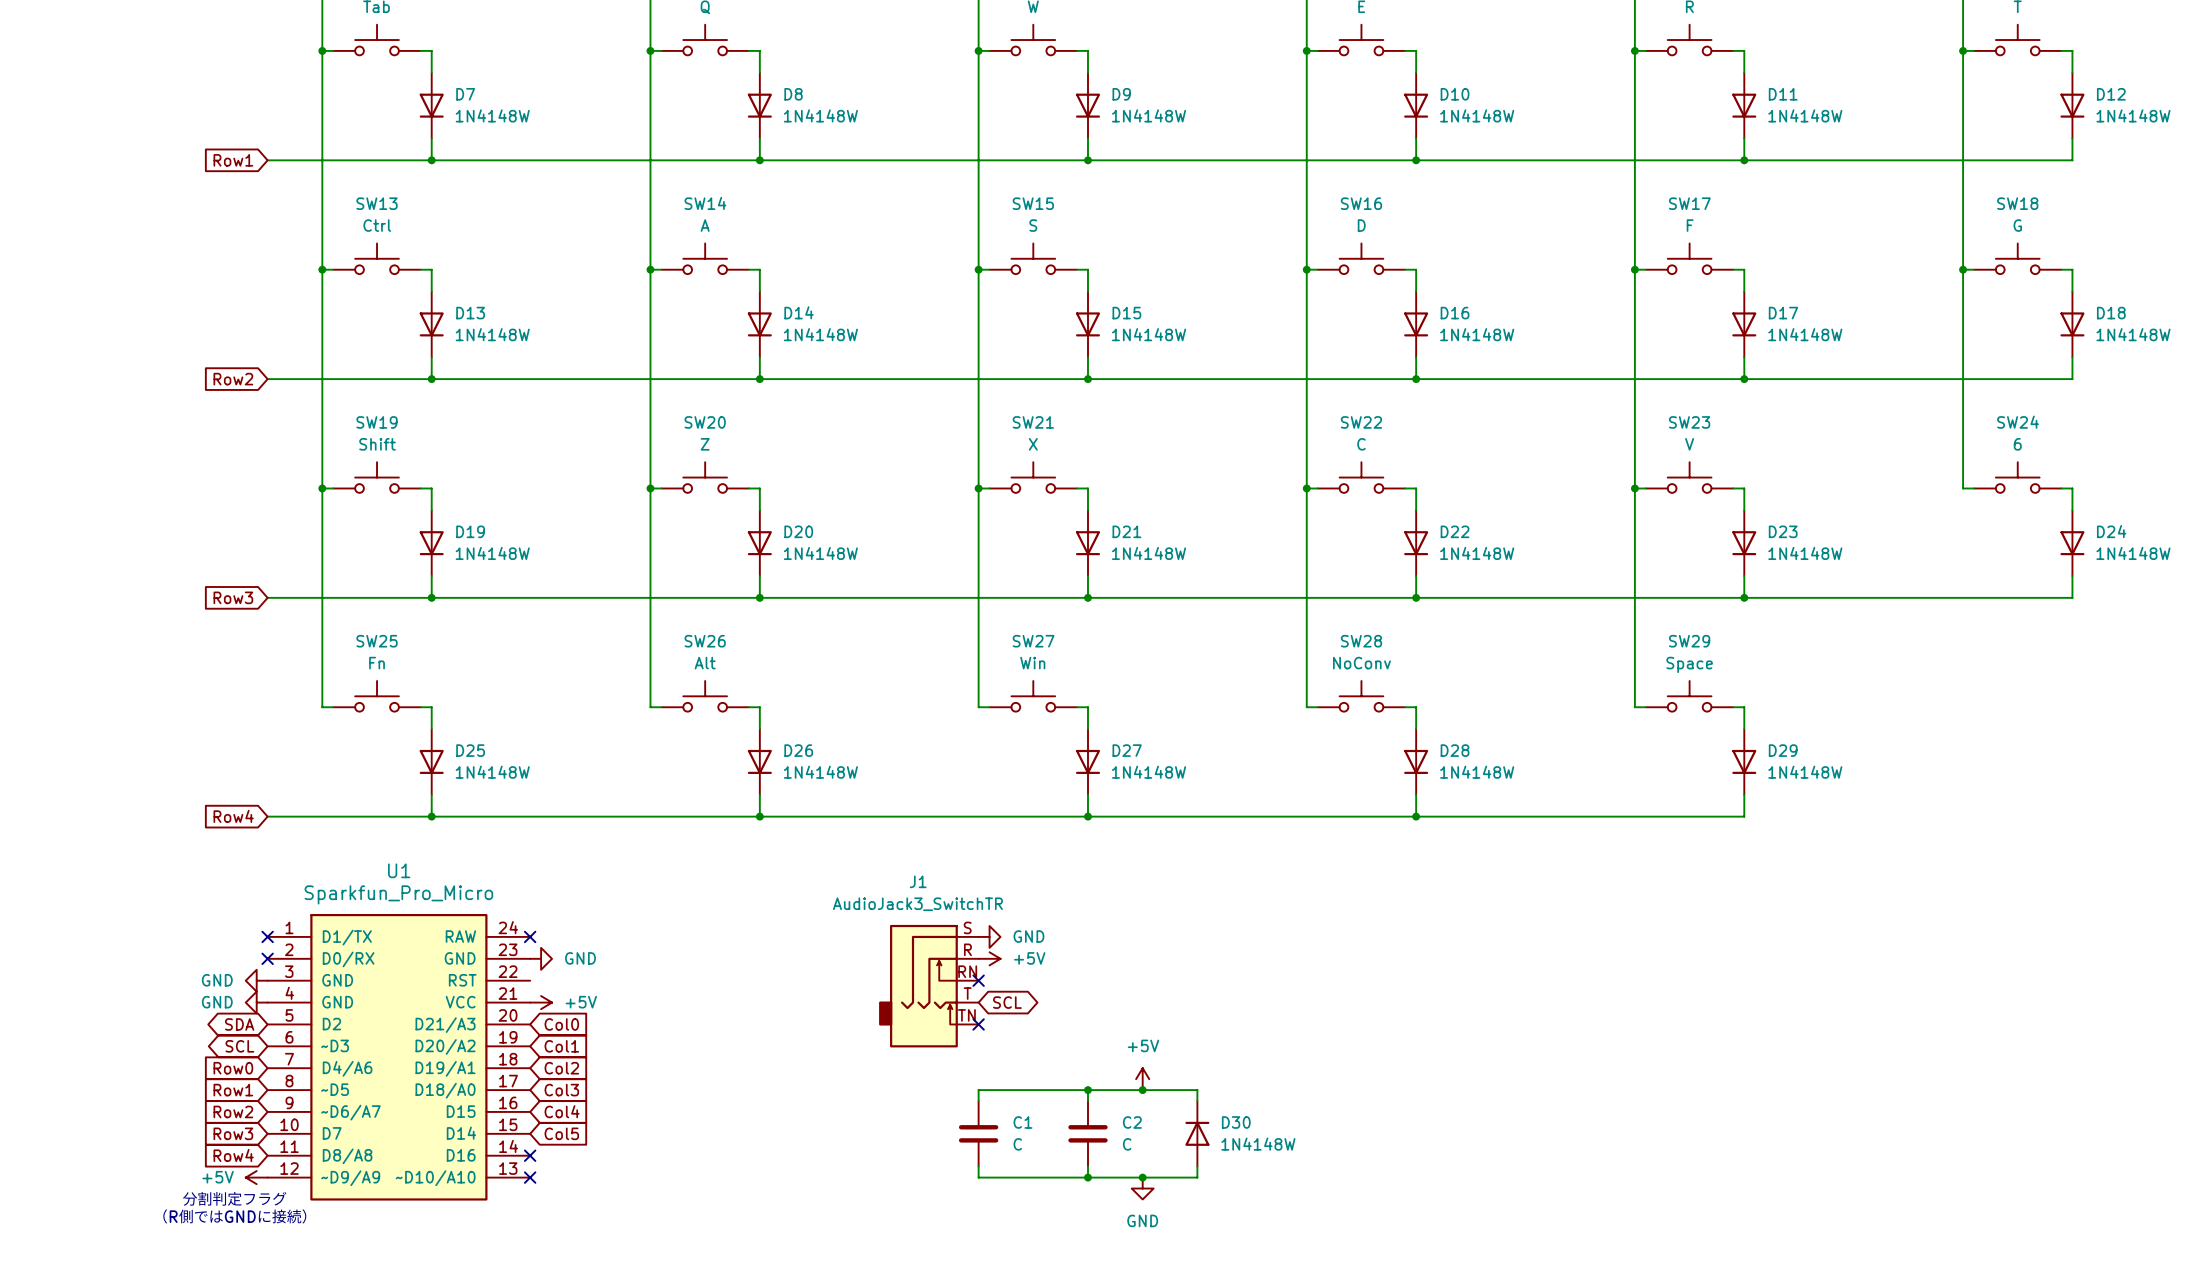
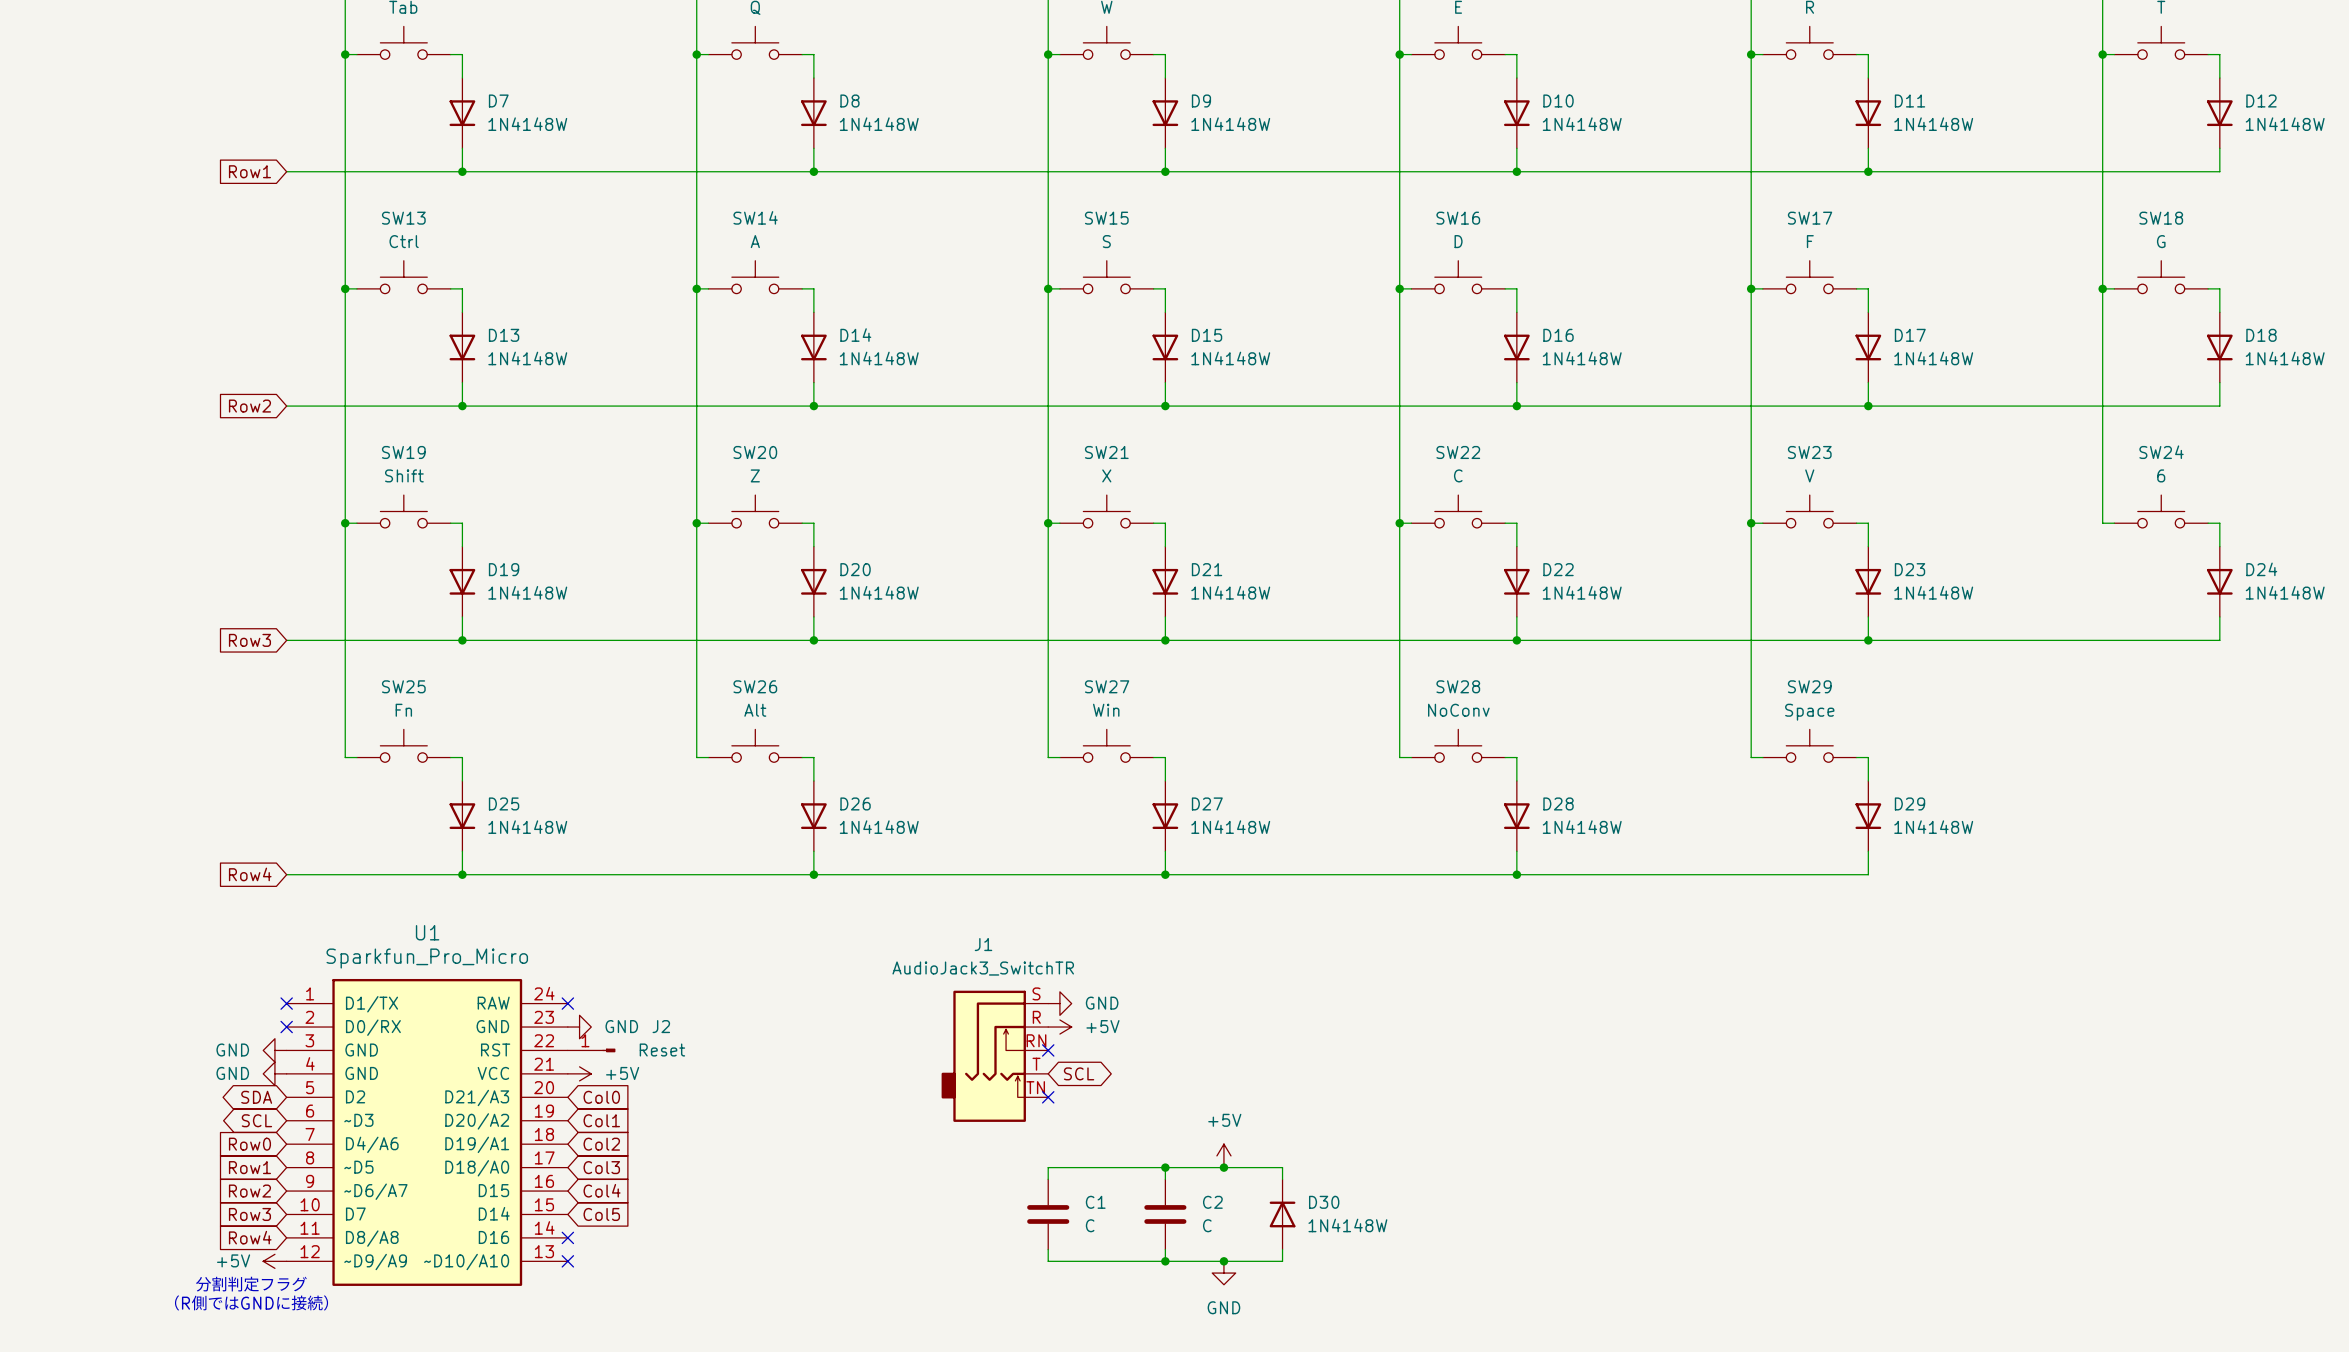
J2: none -> Reset (591, 1050)

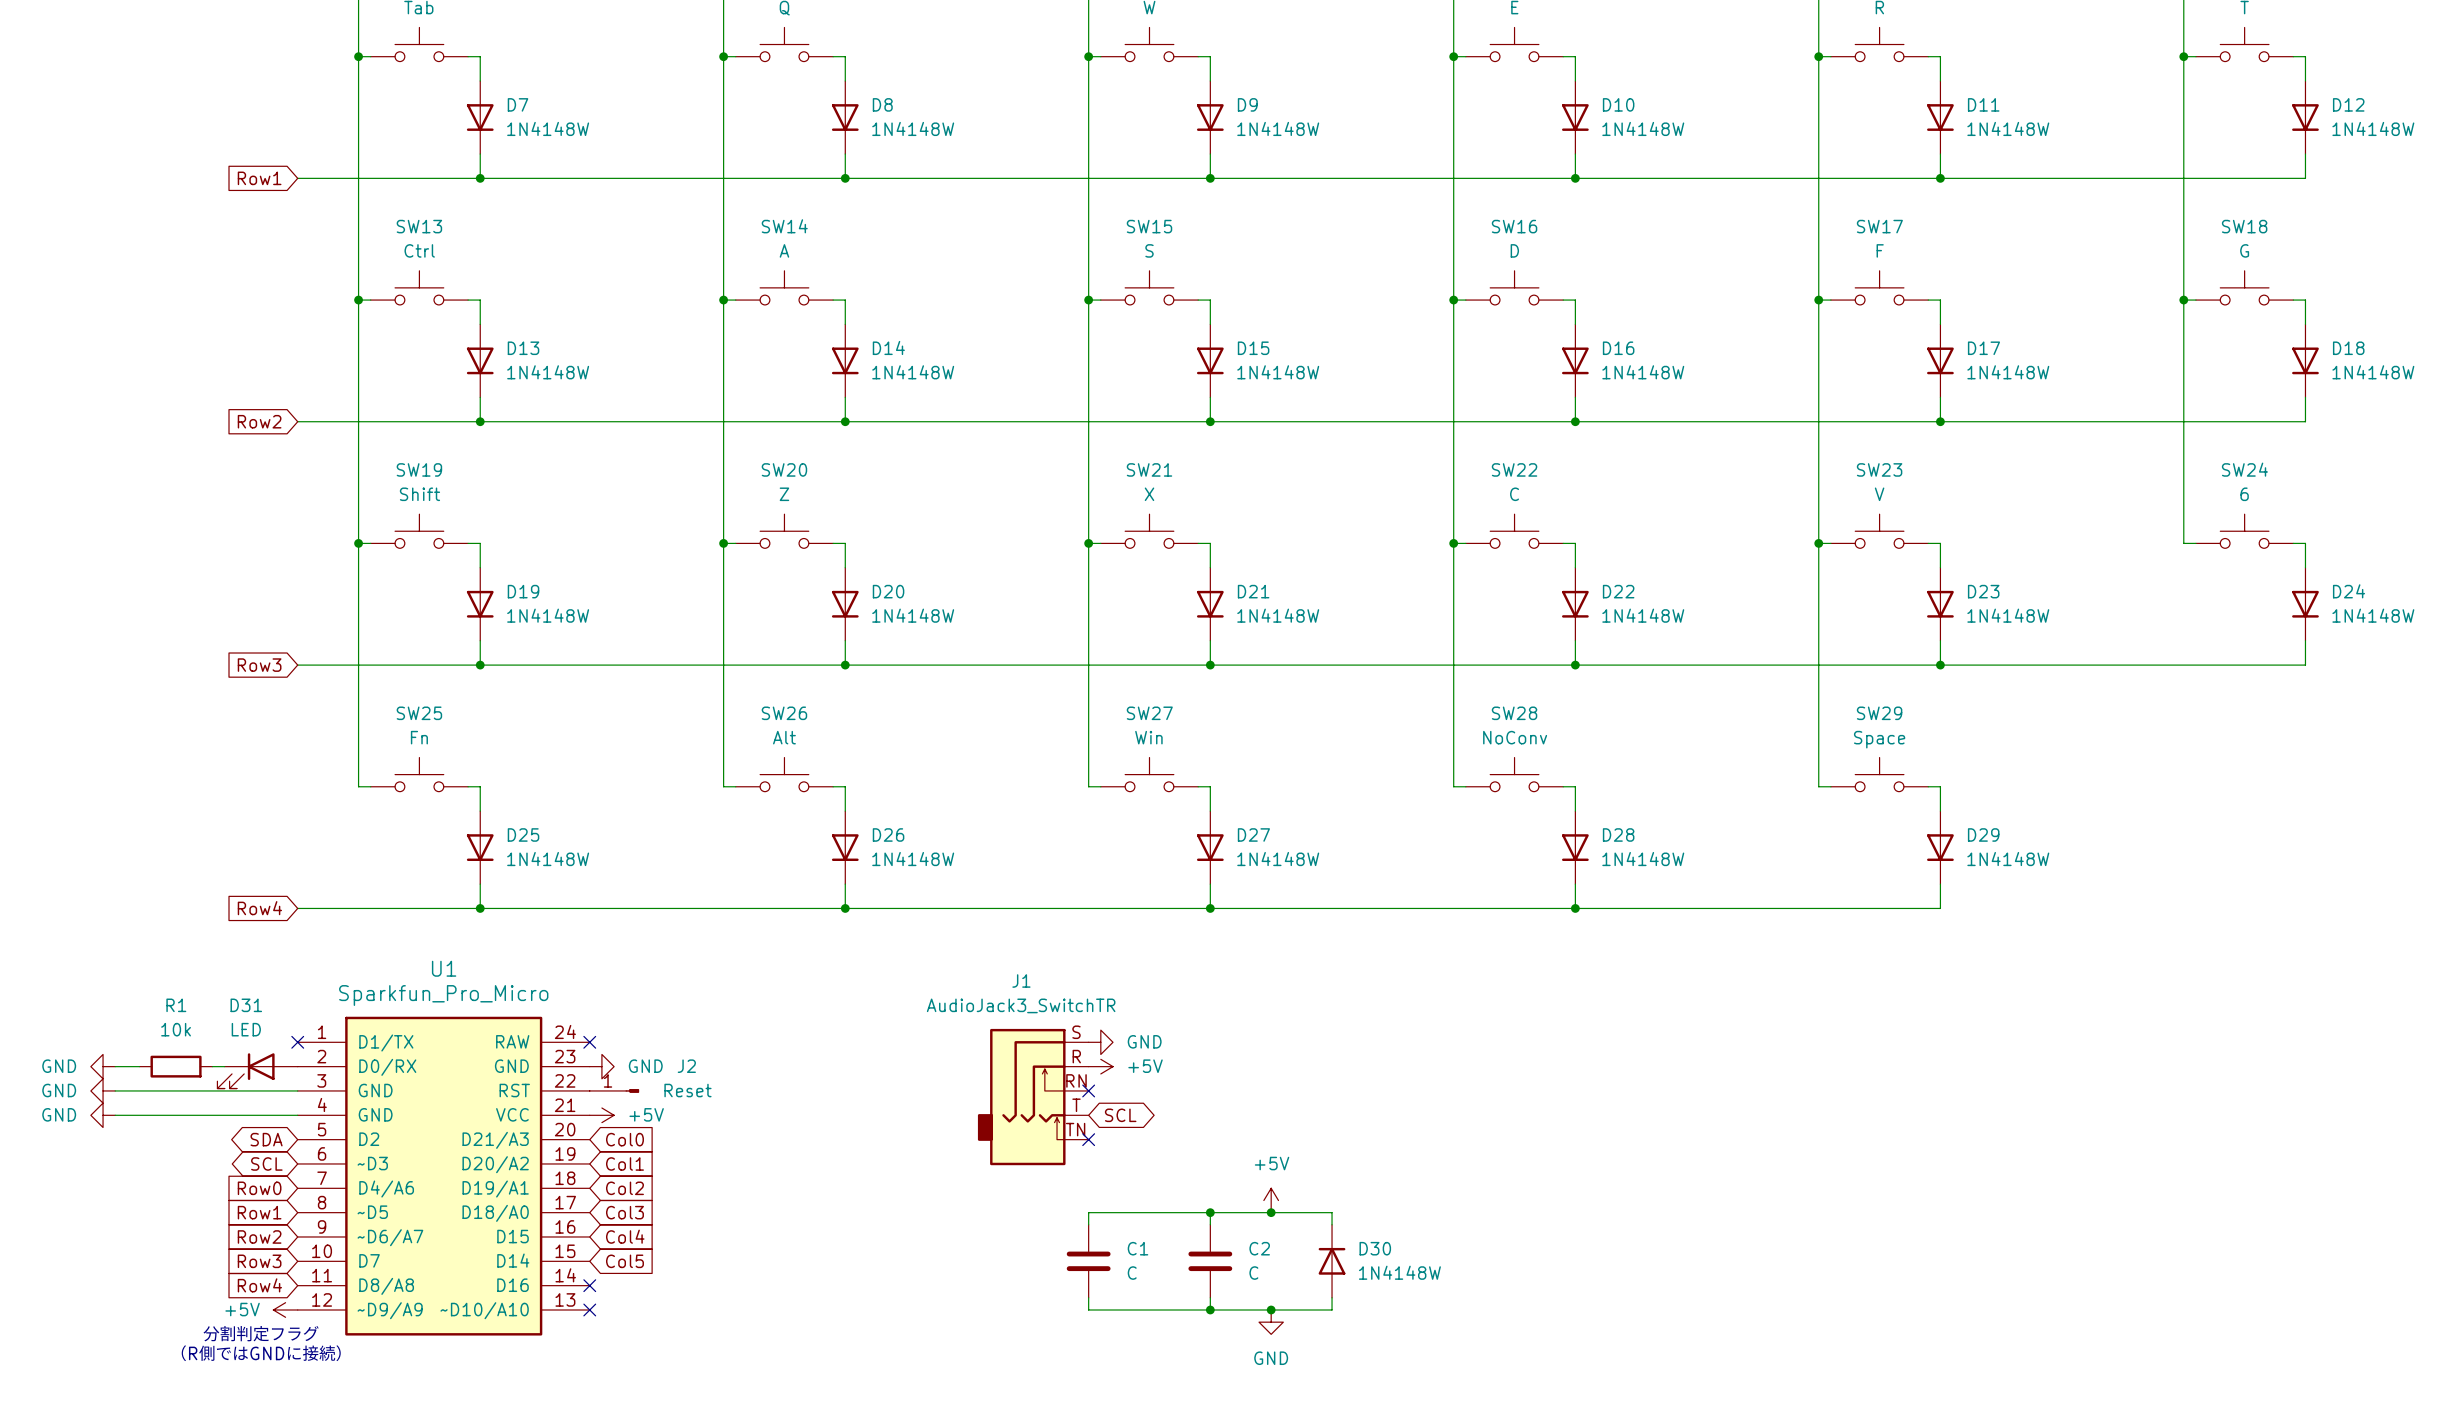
power symbol: none -> GND (103, 1066)
wire: none -> (115, 1066) (139, 1066)
R1: none -> 10k (176, 1066)
wire: none -> (212, 1066) (224, 1066)
no-connect mark: (286, 1027) -> none
D31: none -> LED (257, 1070)
power symbol: none -> GND (103, 1090)
wire: none -> (115, 1090) (297, 1090)
power symbol: GND (274, 1050) -> none
power symbol: none -> GND (103, 1115)
wire: none -> (115, 1115) (297, 1115)
power symbol: GND (274, 1073) -> none

